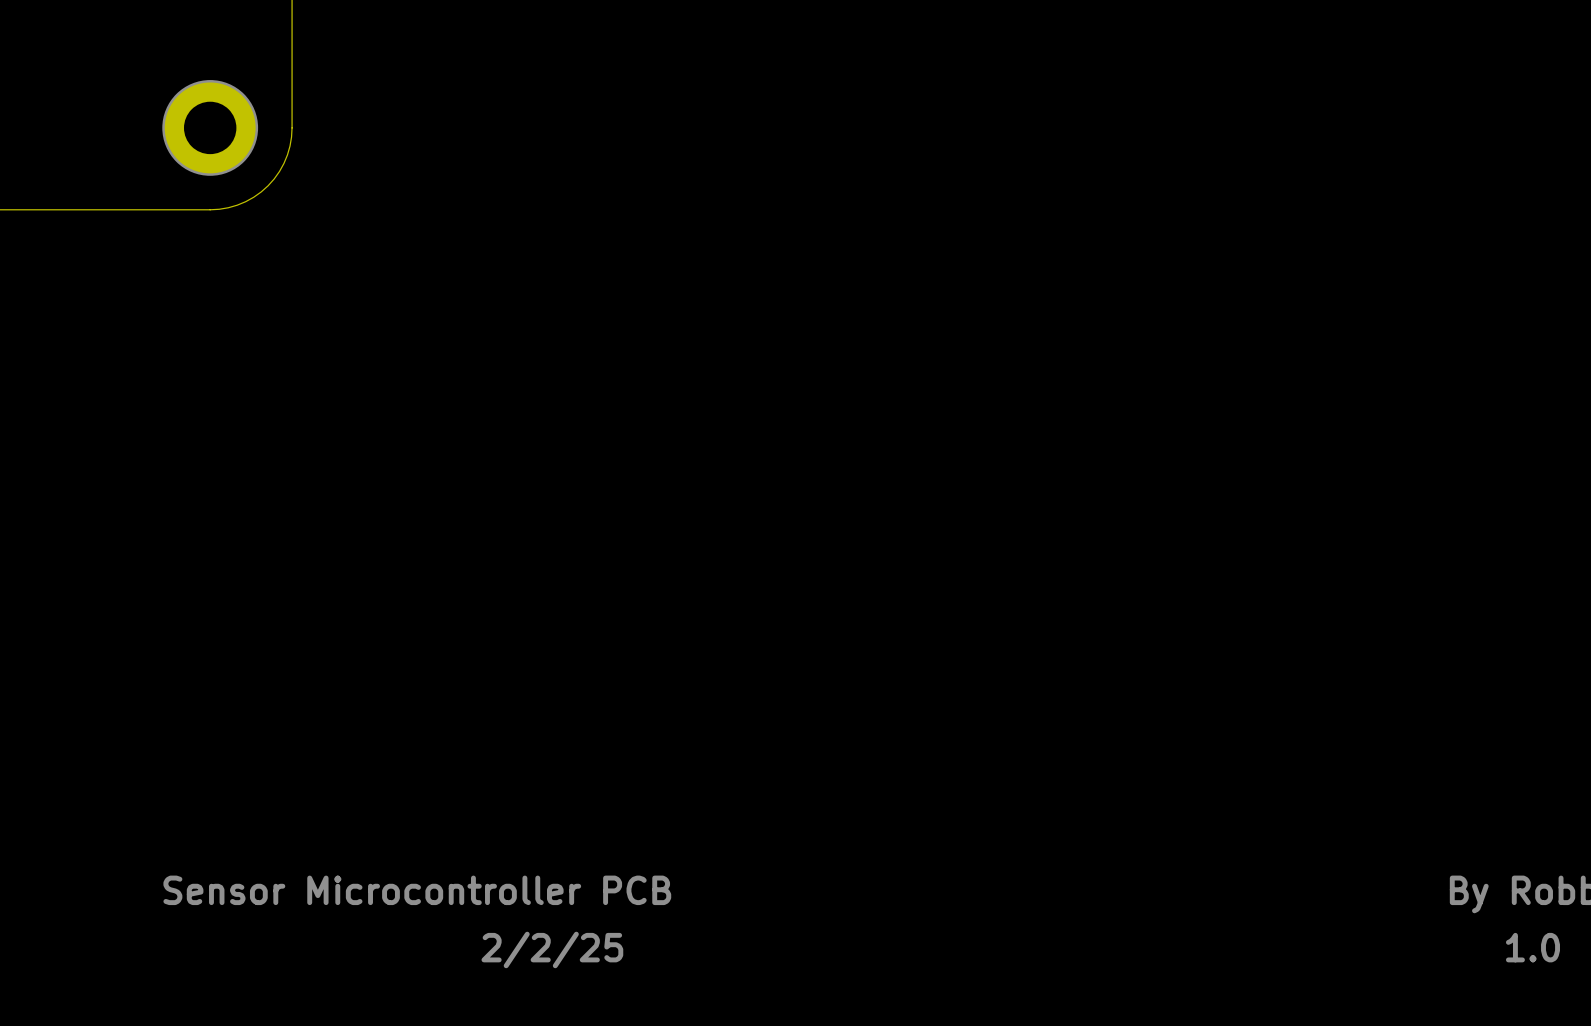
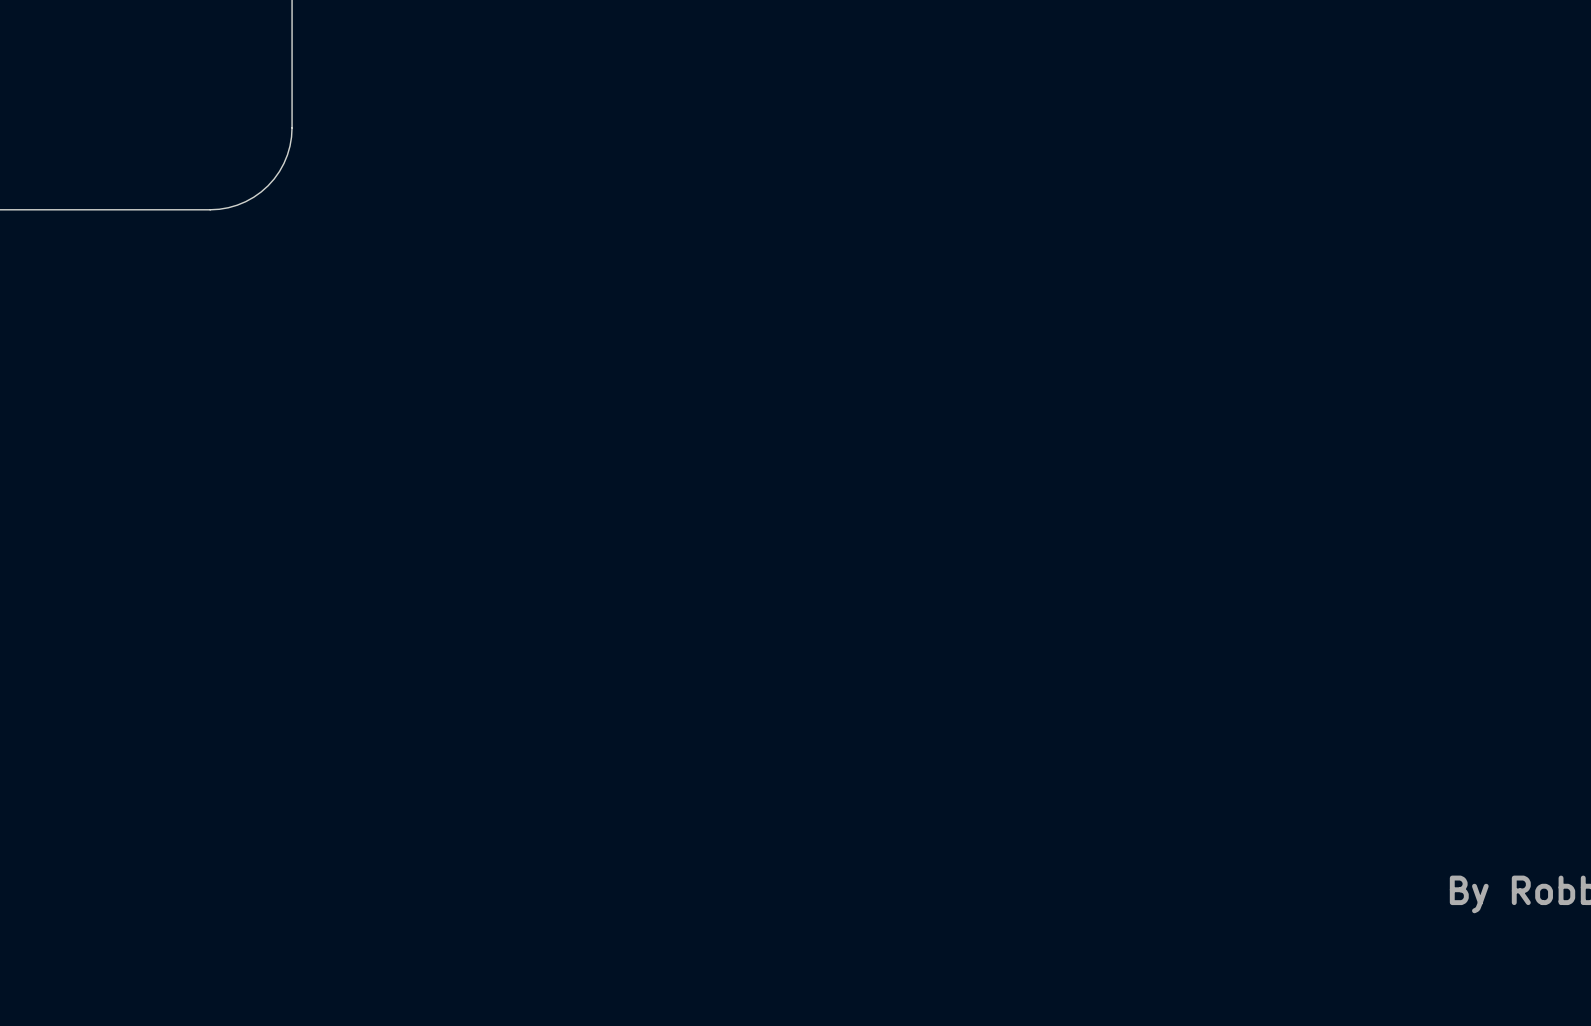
part: (210, 127) -> none
text: Sensor Microcontroller PCB (417, 890) -> none
text: 1.0 (1532, 947) -> none
text: 2/2/25 (552, 949) -> none

